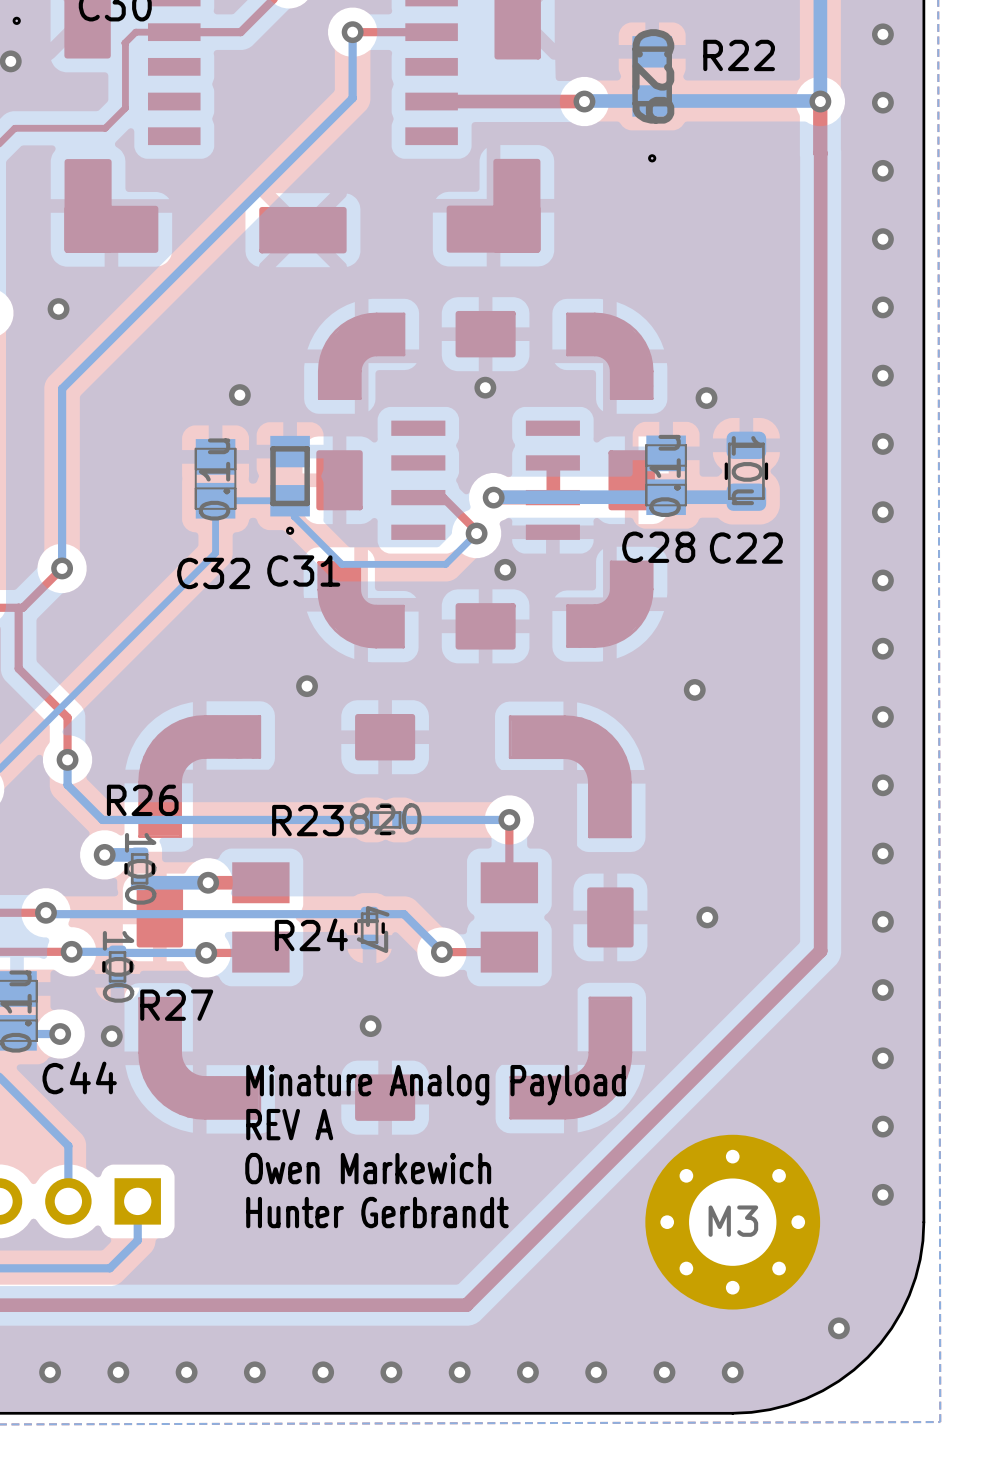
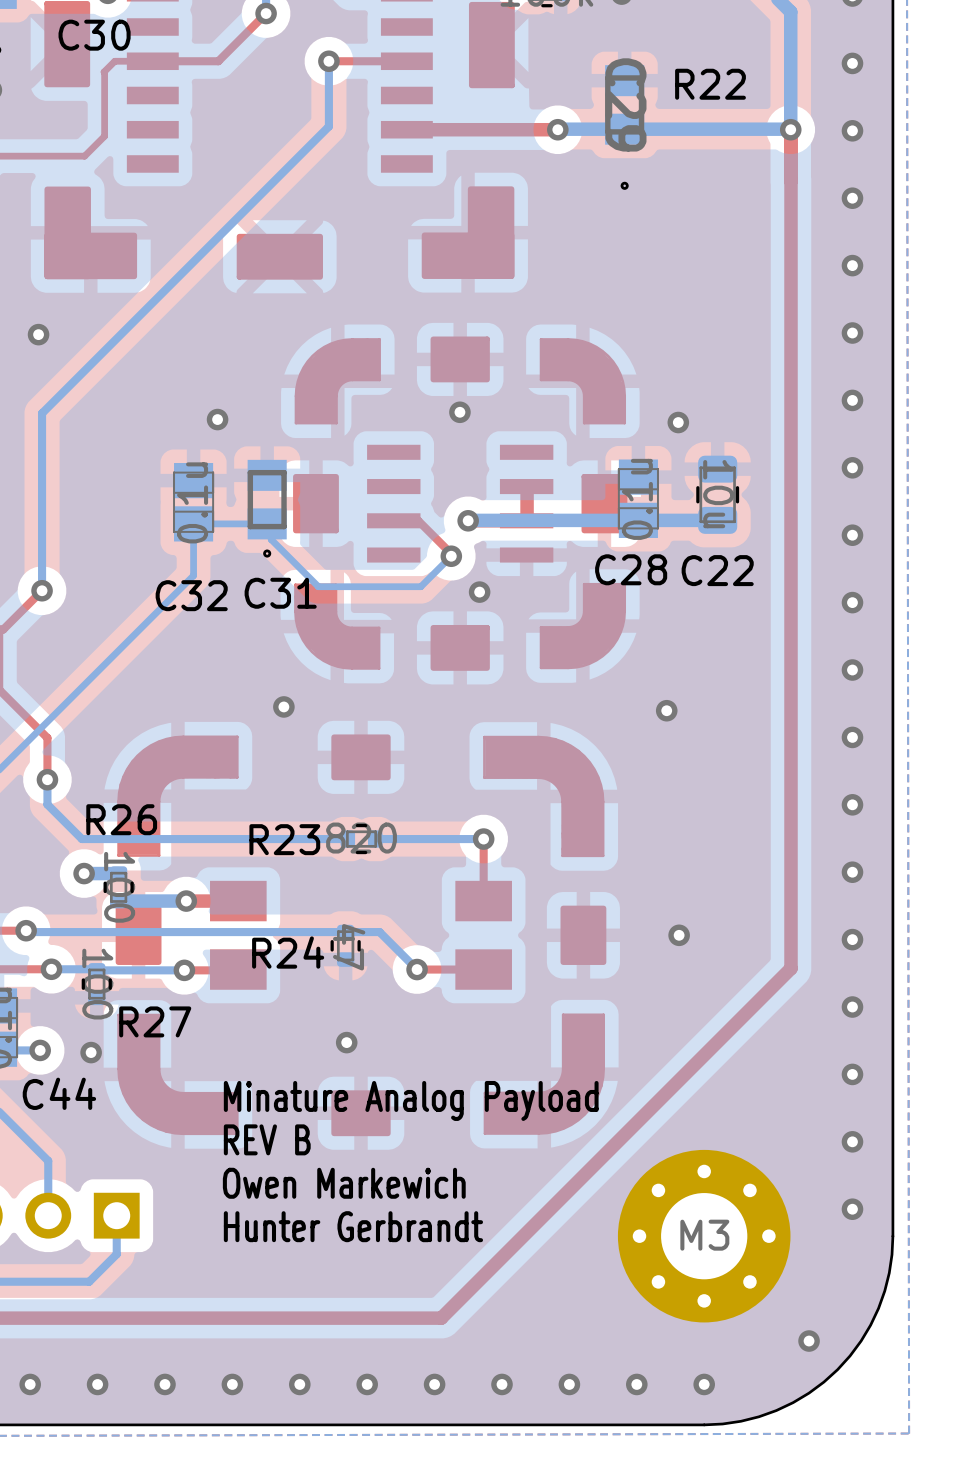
text: REV A (289, 1124) -> REV B (267, 1139)

